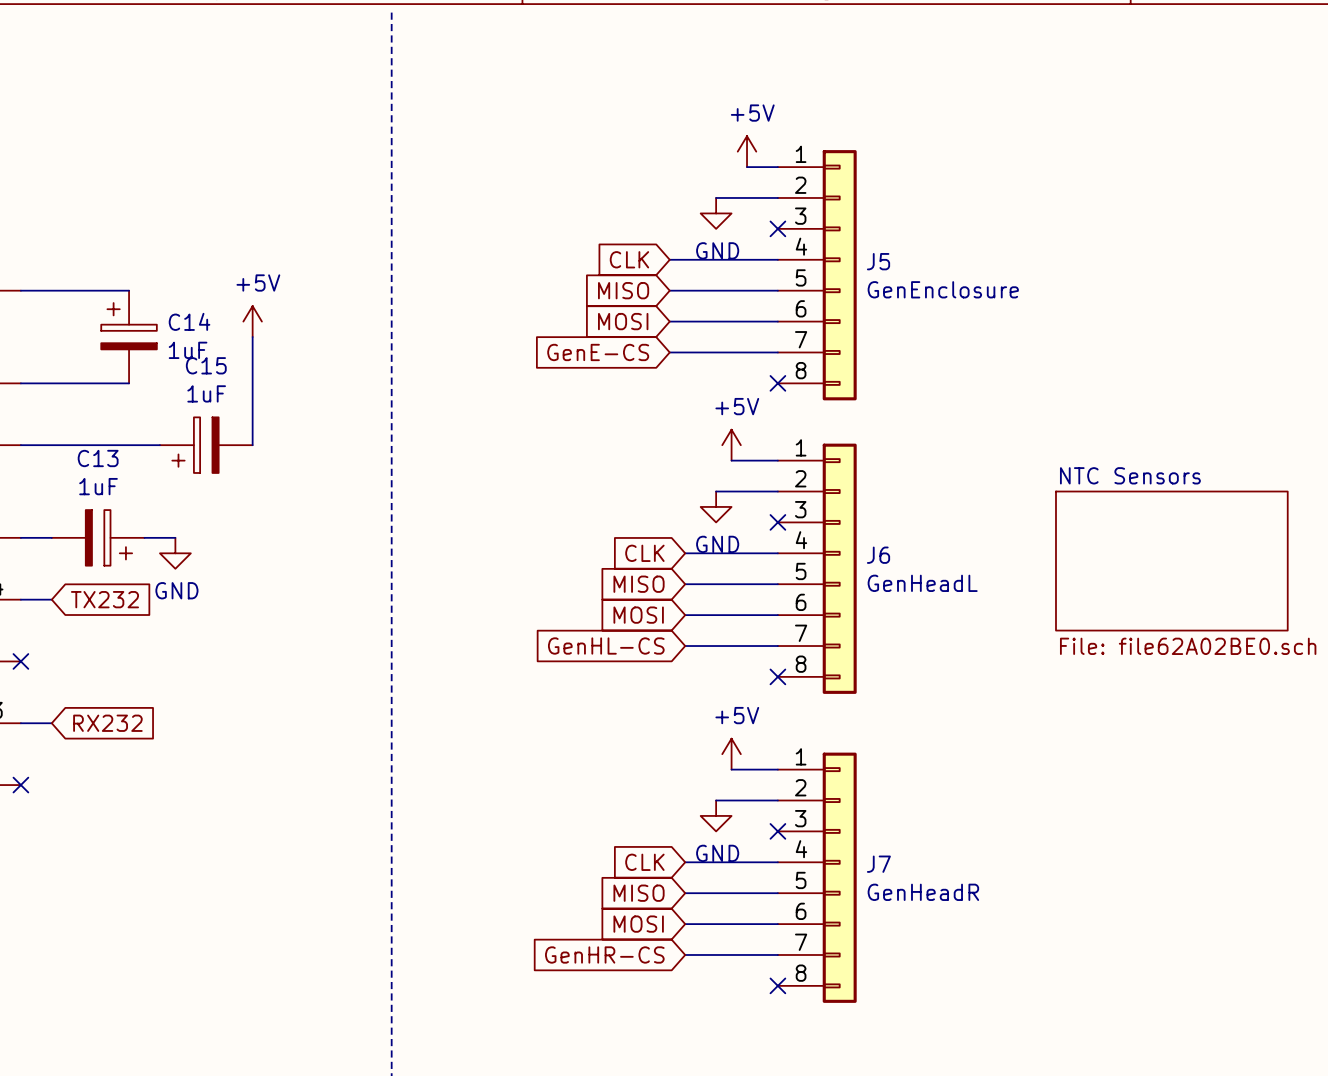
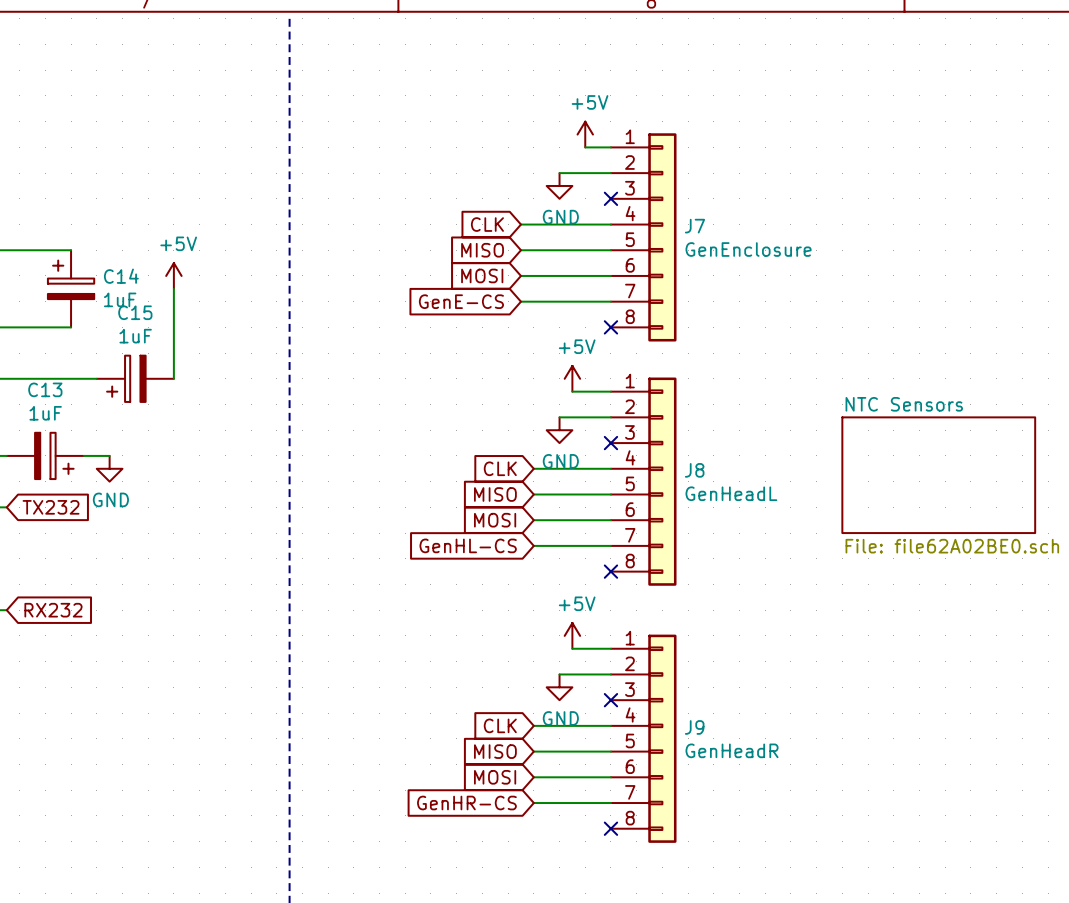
J5 name: J5 (878, 261) -> J7 (694, 226)
J6 name: J6 (878, 555) -> J8 (694, 470)
J7 name: J7 (878, 864) -> J9 (694, 727)

